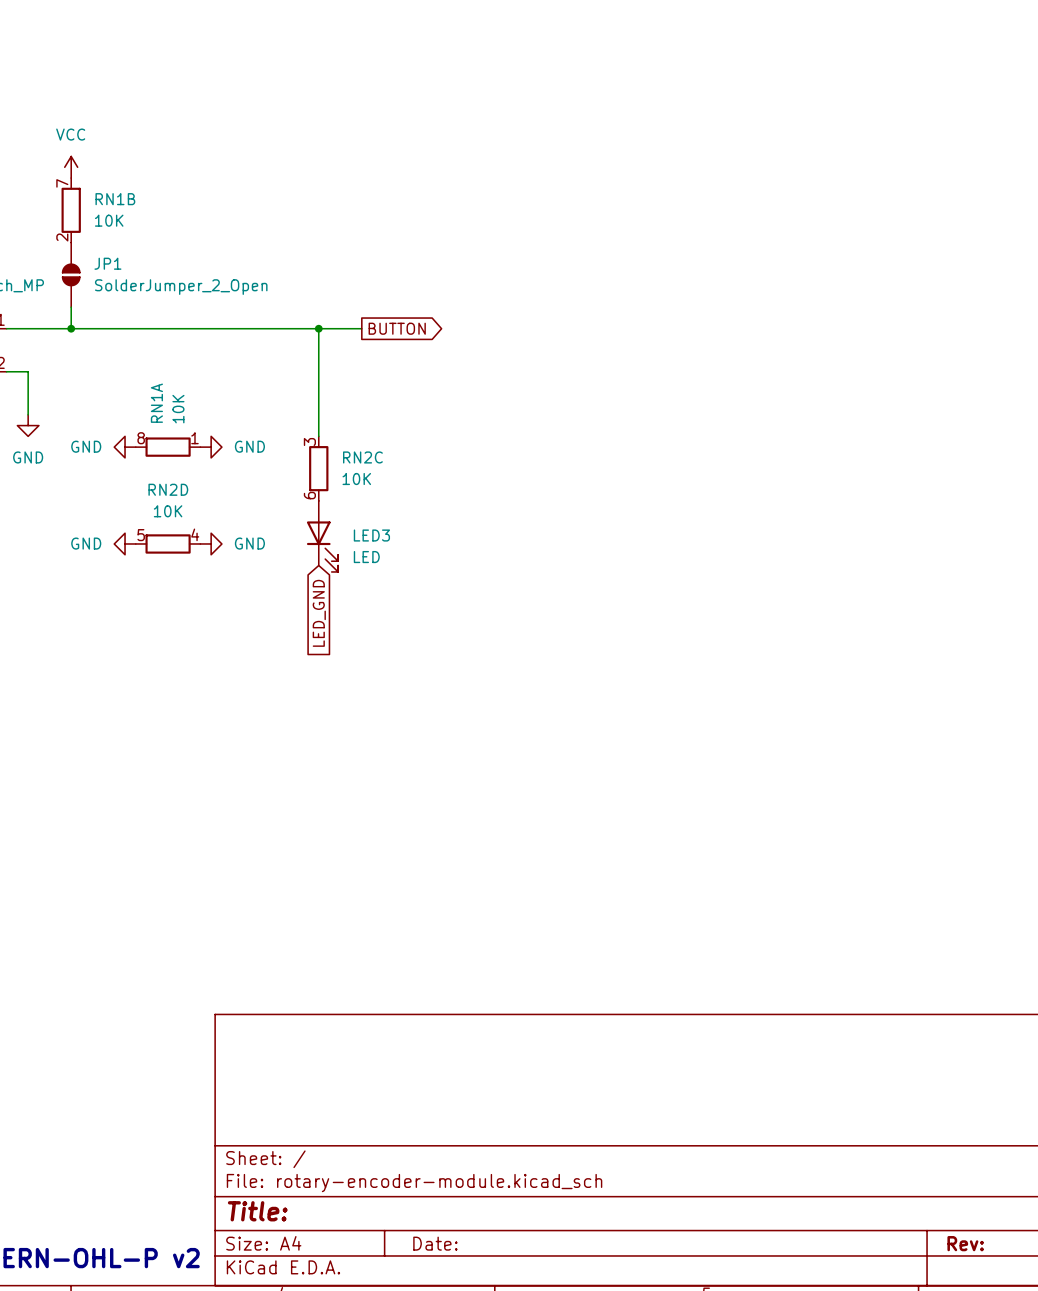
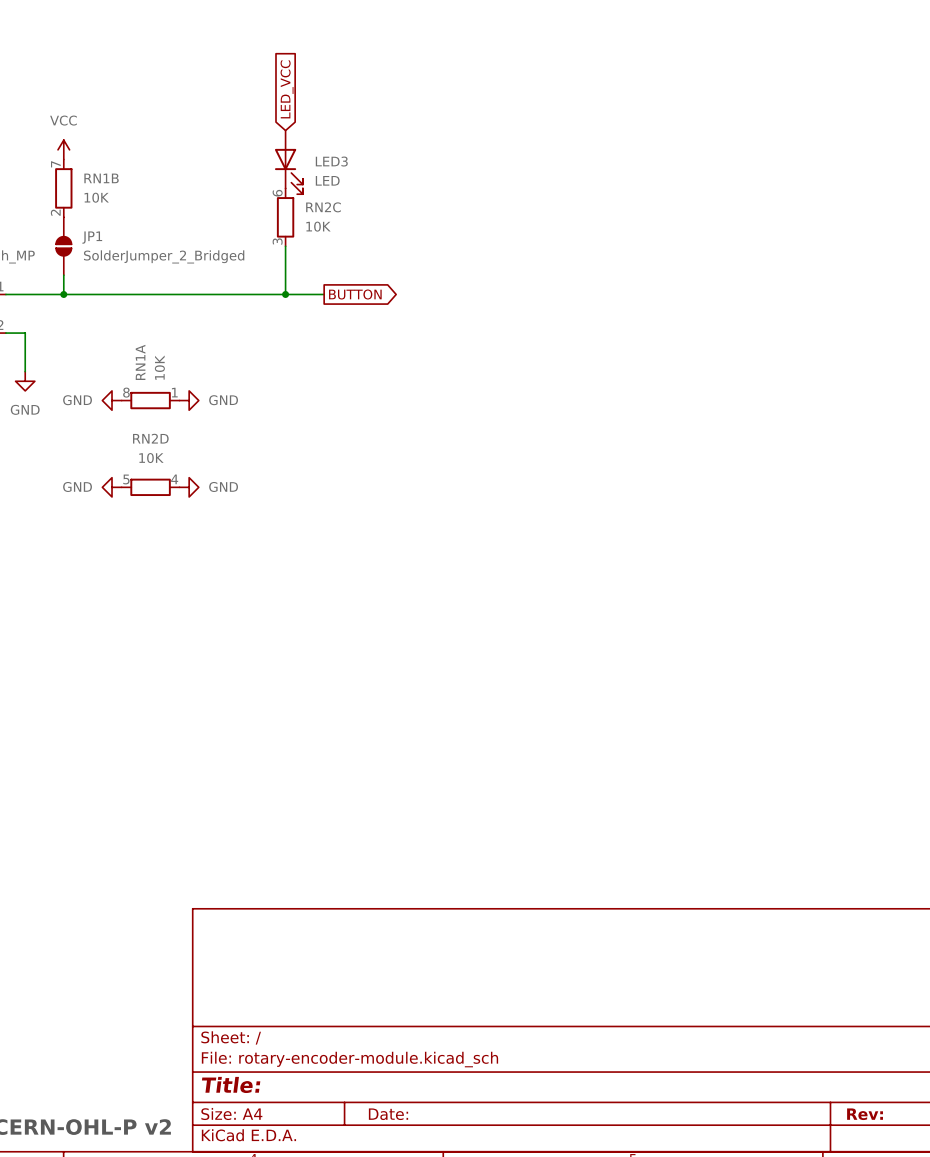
global label: none -> LED_VCC (287, 89)
JP1 value: SolderJumper_2_Open (181, 287) -> SolderJumper_2_Bridged (164, 256)
wire: (318, 328) (318, 436) -> (285, 294) (285, 246)
RN2C rotation: 0° (318, 468) -> 180° (285, 217)
RN2C position: (318, 468) -> (285, 217)
LED3 position: (322, 536) -> (288, 162)
global label: LED_GND (319, 613) -> none

